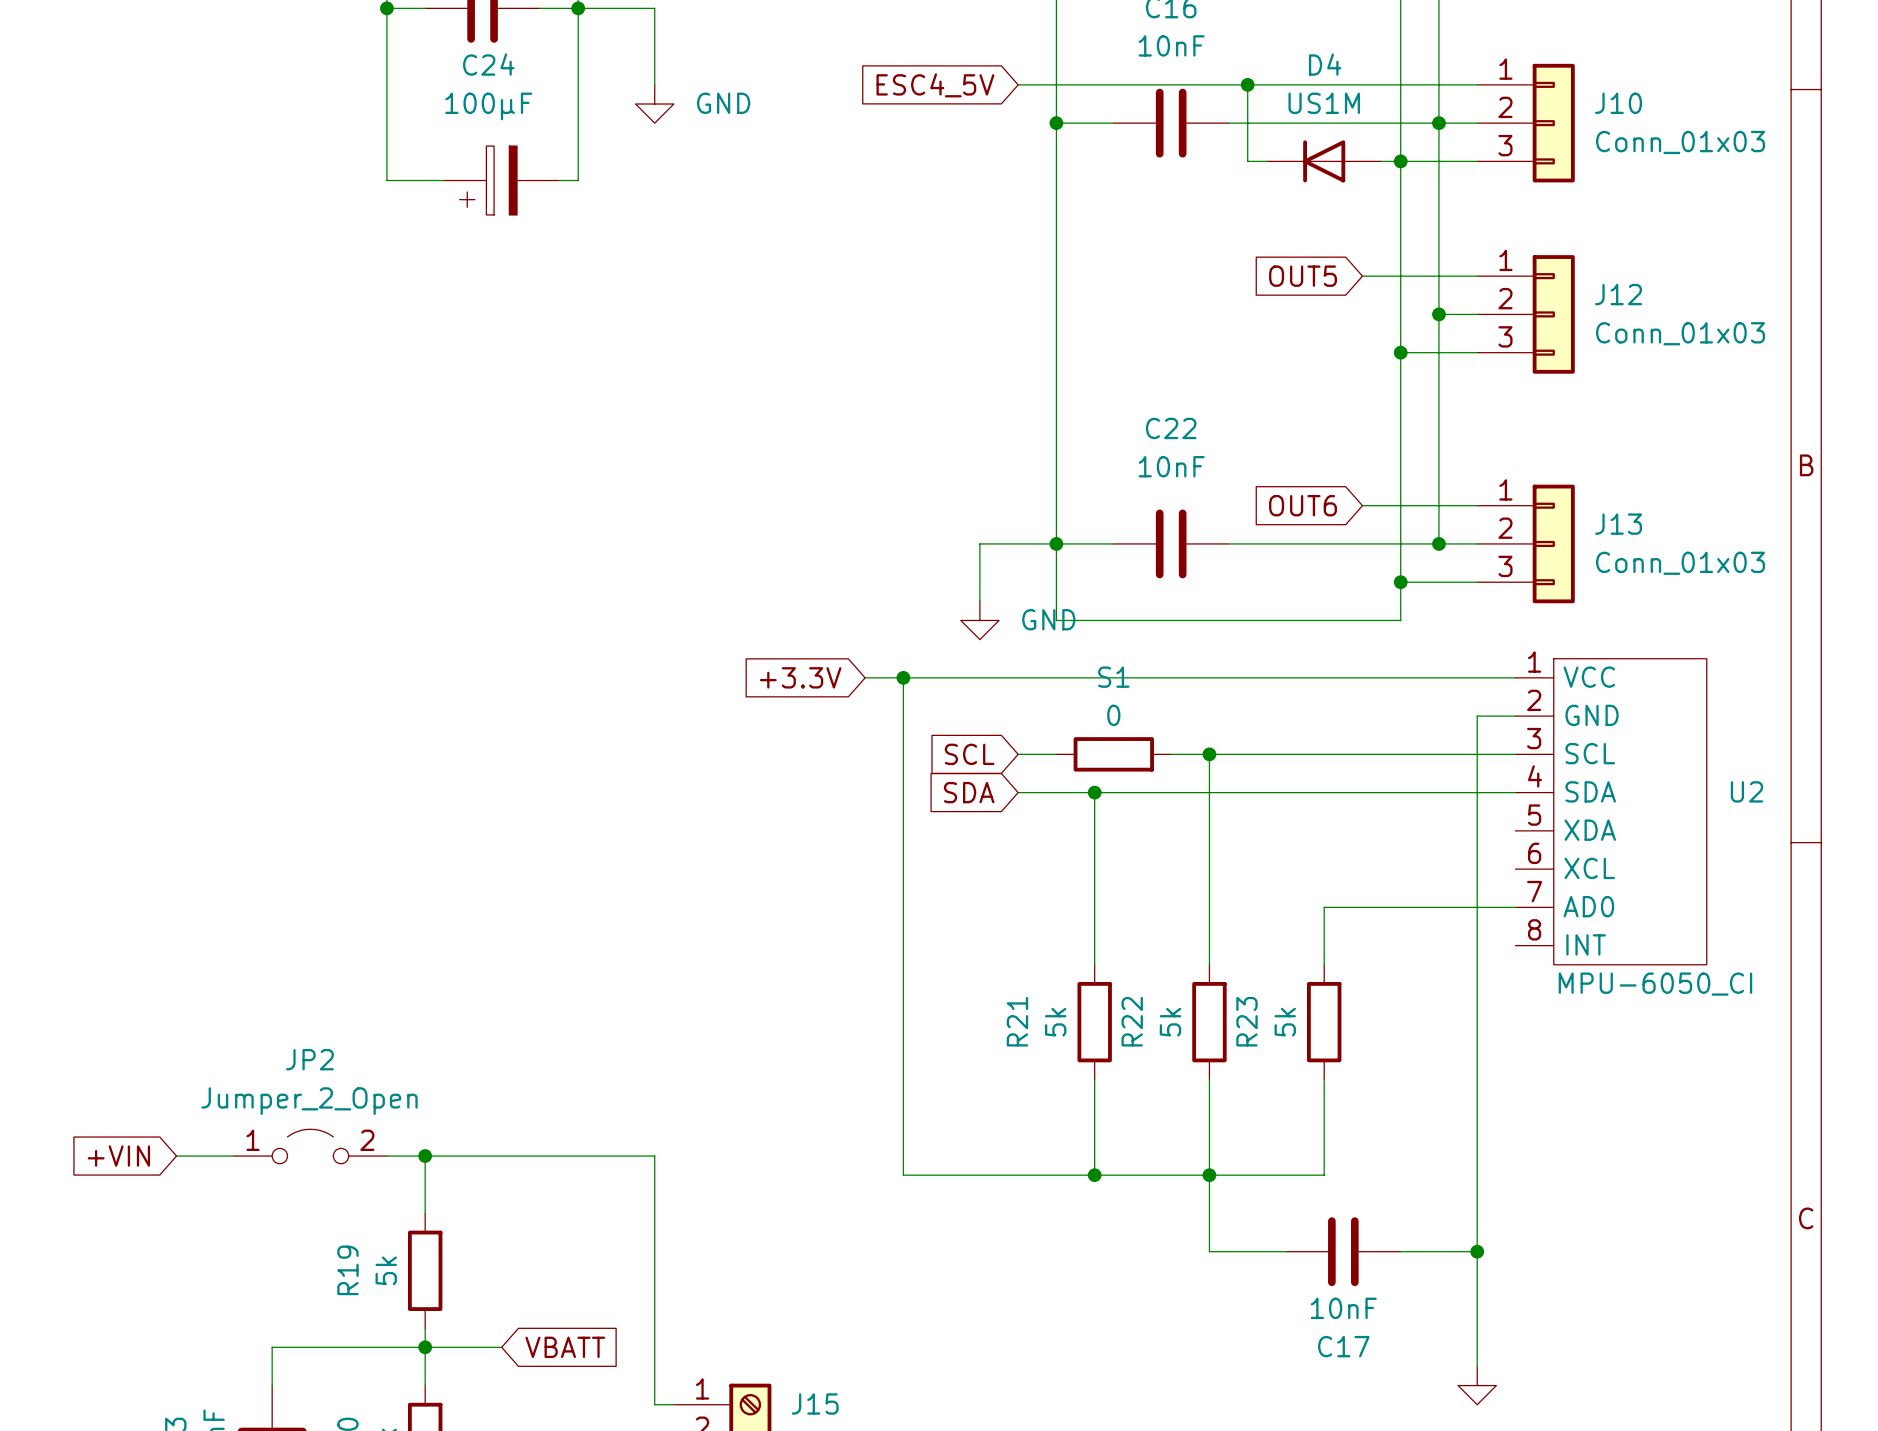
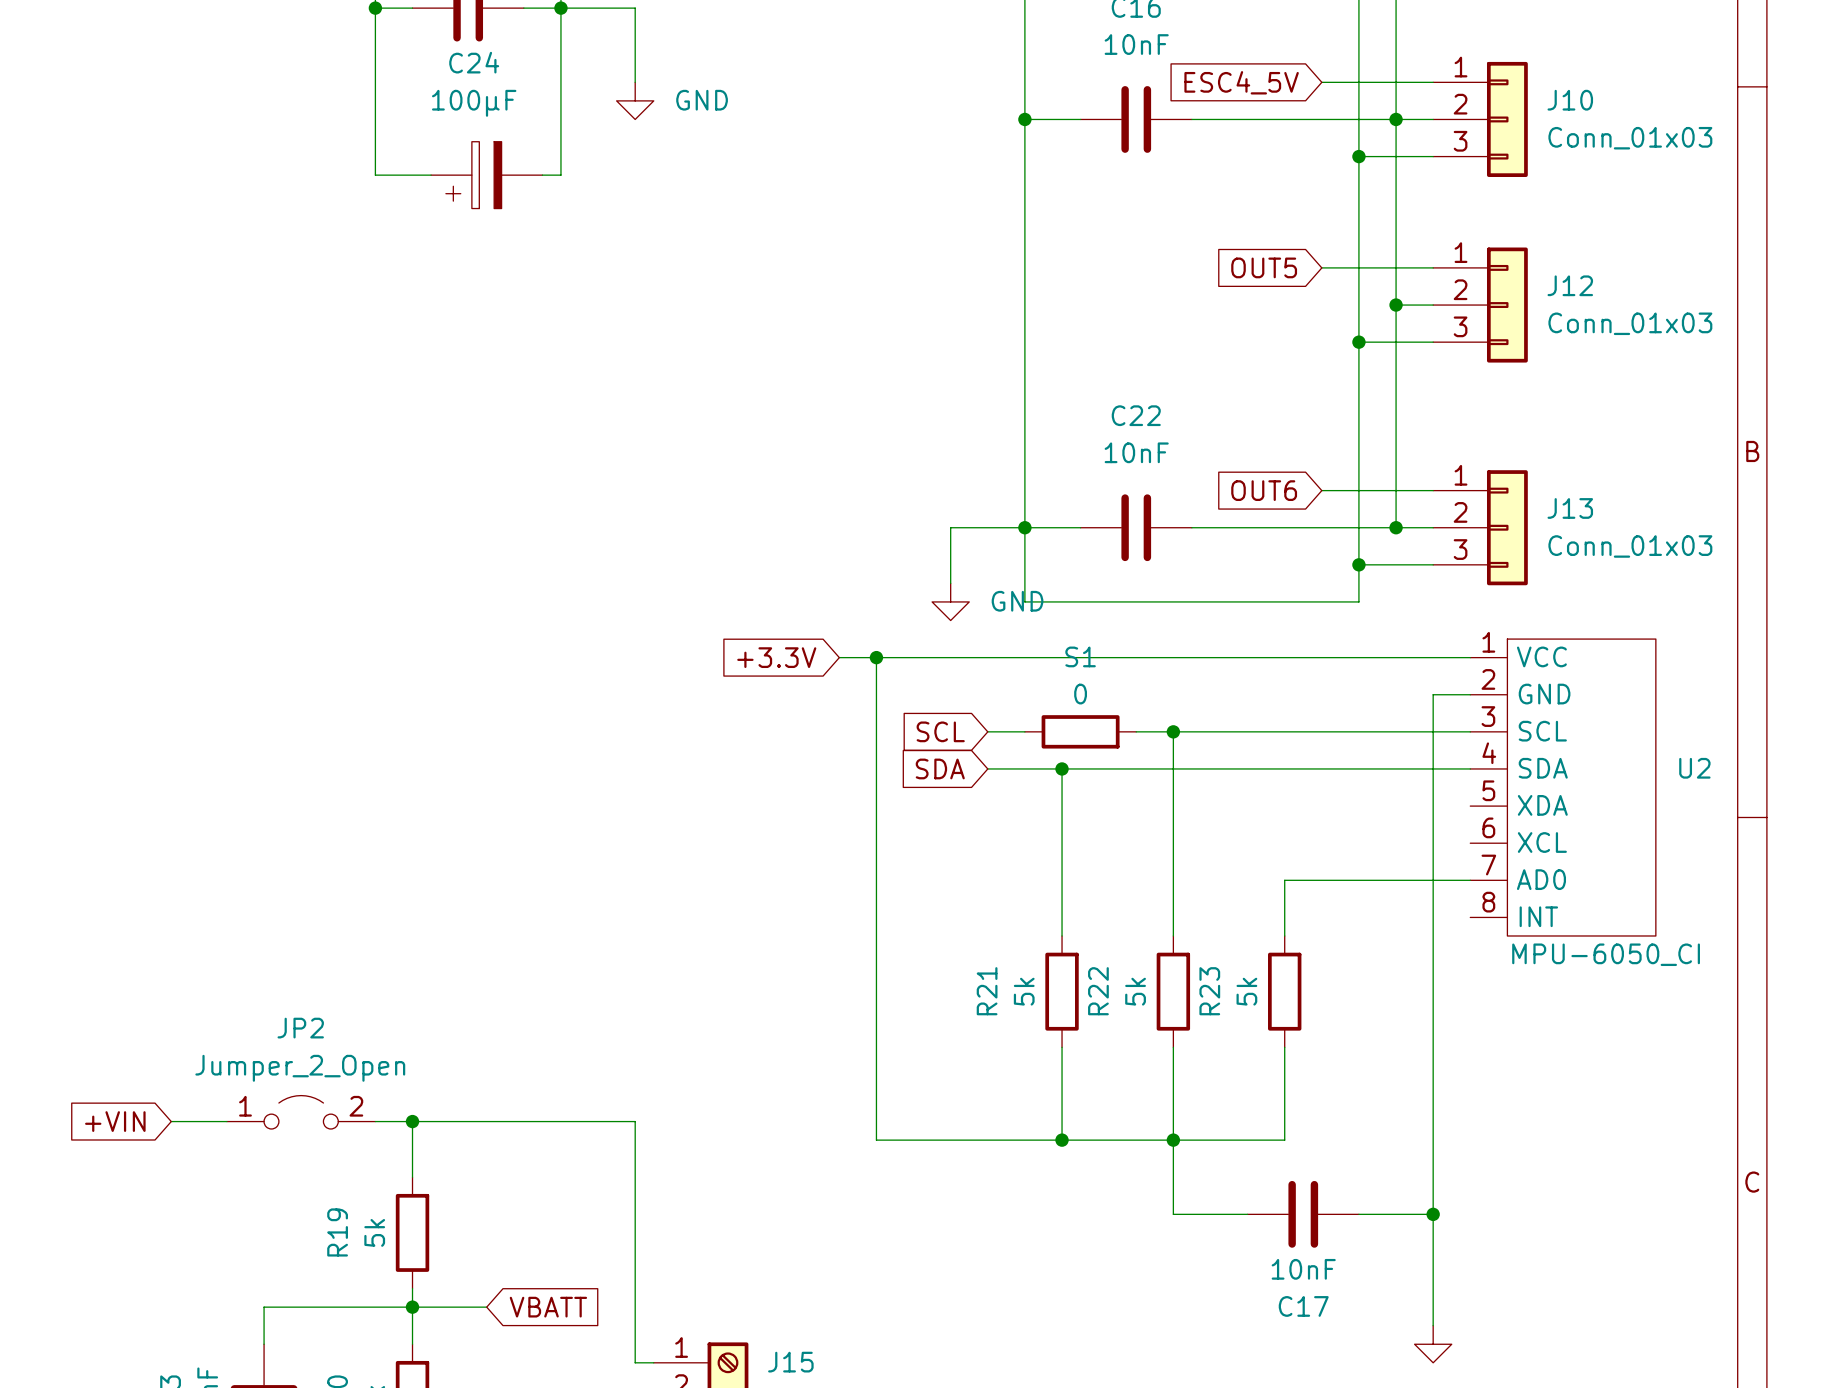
wire: (1018, 84) (1362, 84) -> none
wire: (1247, 84) (1247, 161) (1266, 161) -> none
junction: (1247, 84) -> none
global label position: ESC4_5V (935, 85) -> ESC4_5V (1241, 82)
D4: US1M (1324, 161) -> none
wire: (1381, 161) (1400, 161) -> none

